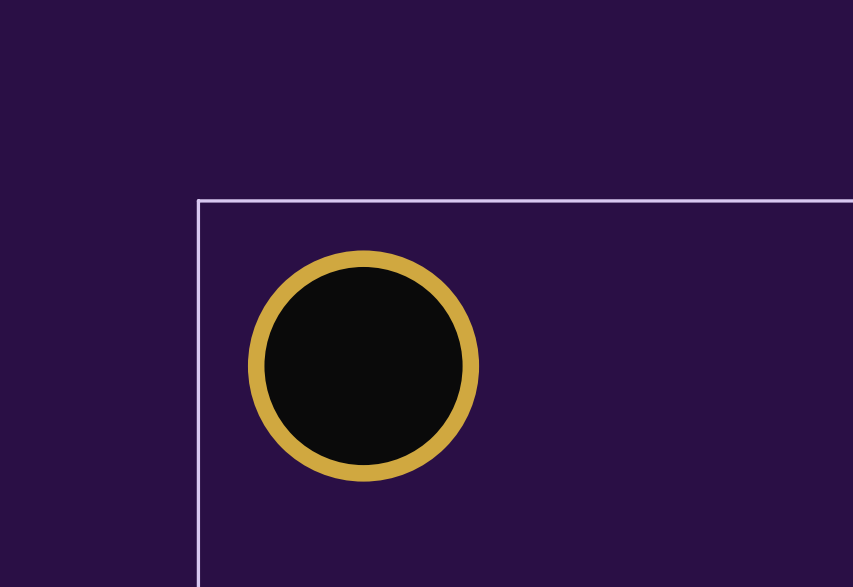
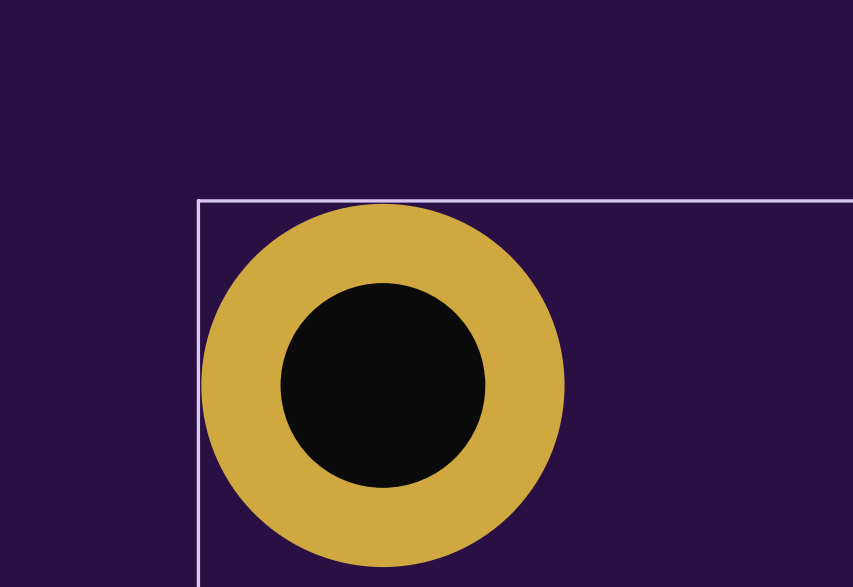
via size: [247, 250, 480, 482] -> [201, 203, 565, 568]

